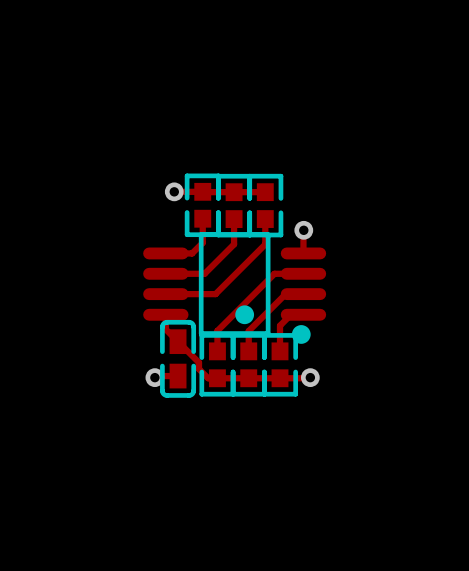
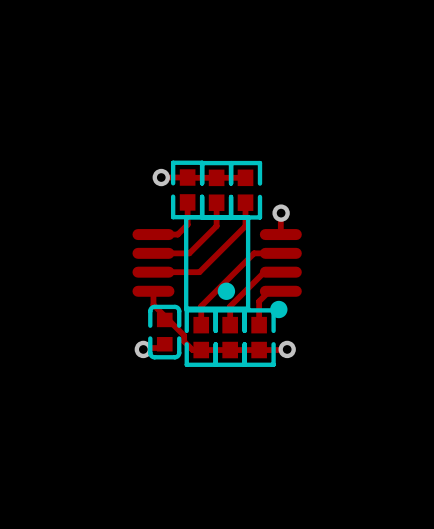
part footprint: [160, 319, 197, 398] -> [148, 304, 182, 360]

